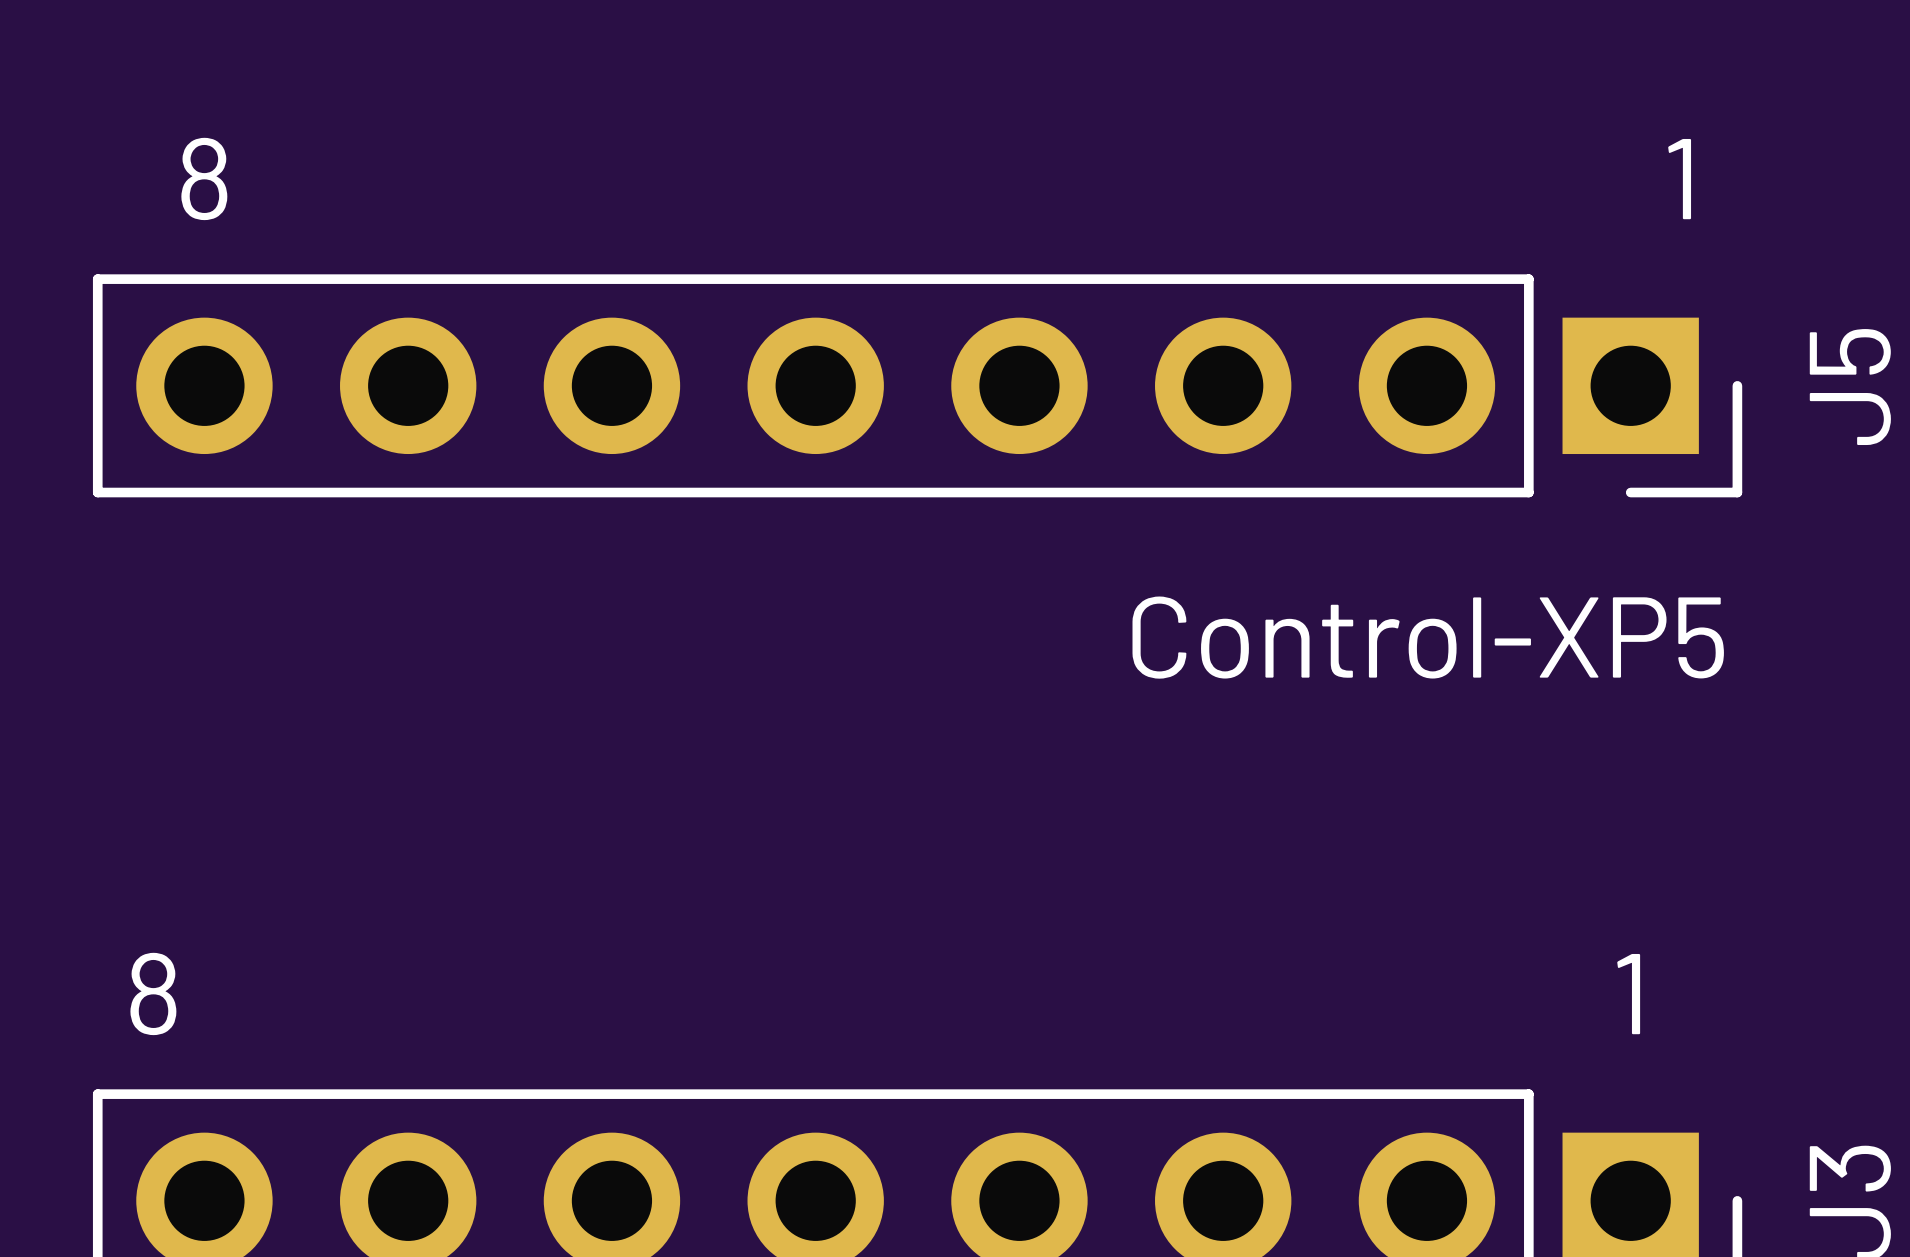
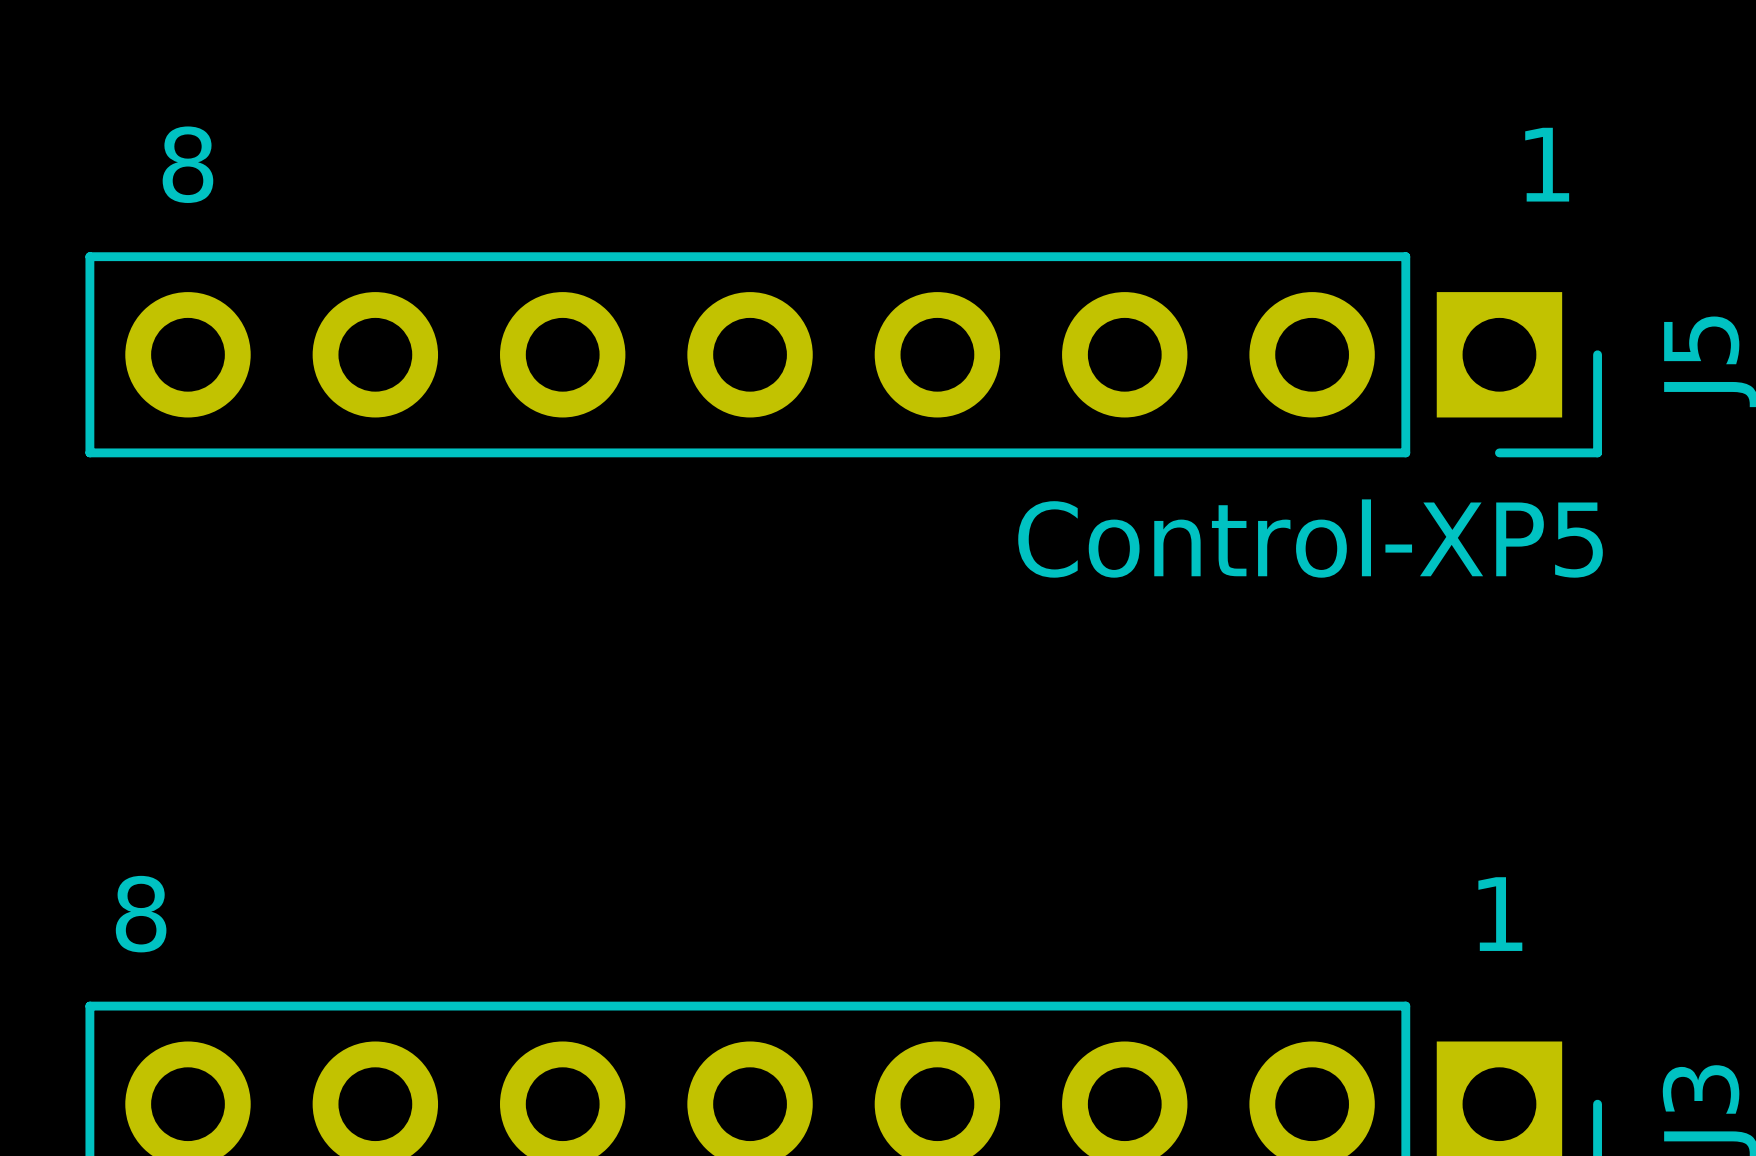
J5 value position: Control-XP5 (1428, 637) -> Control-XP5 (1310, 538)

